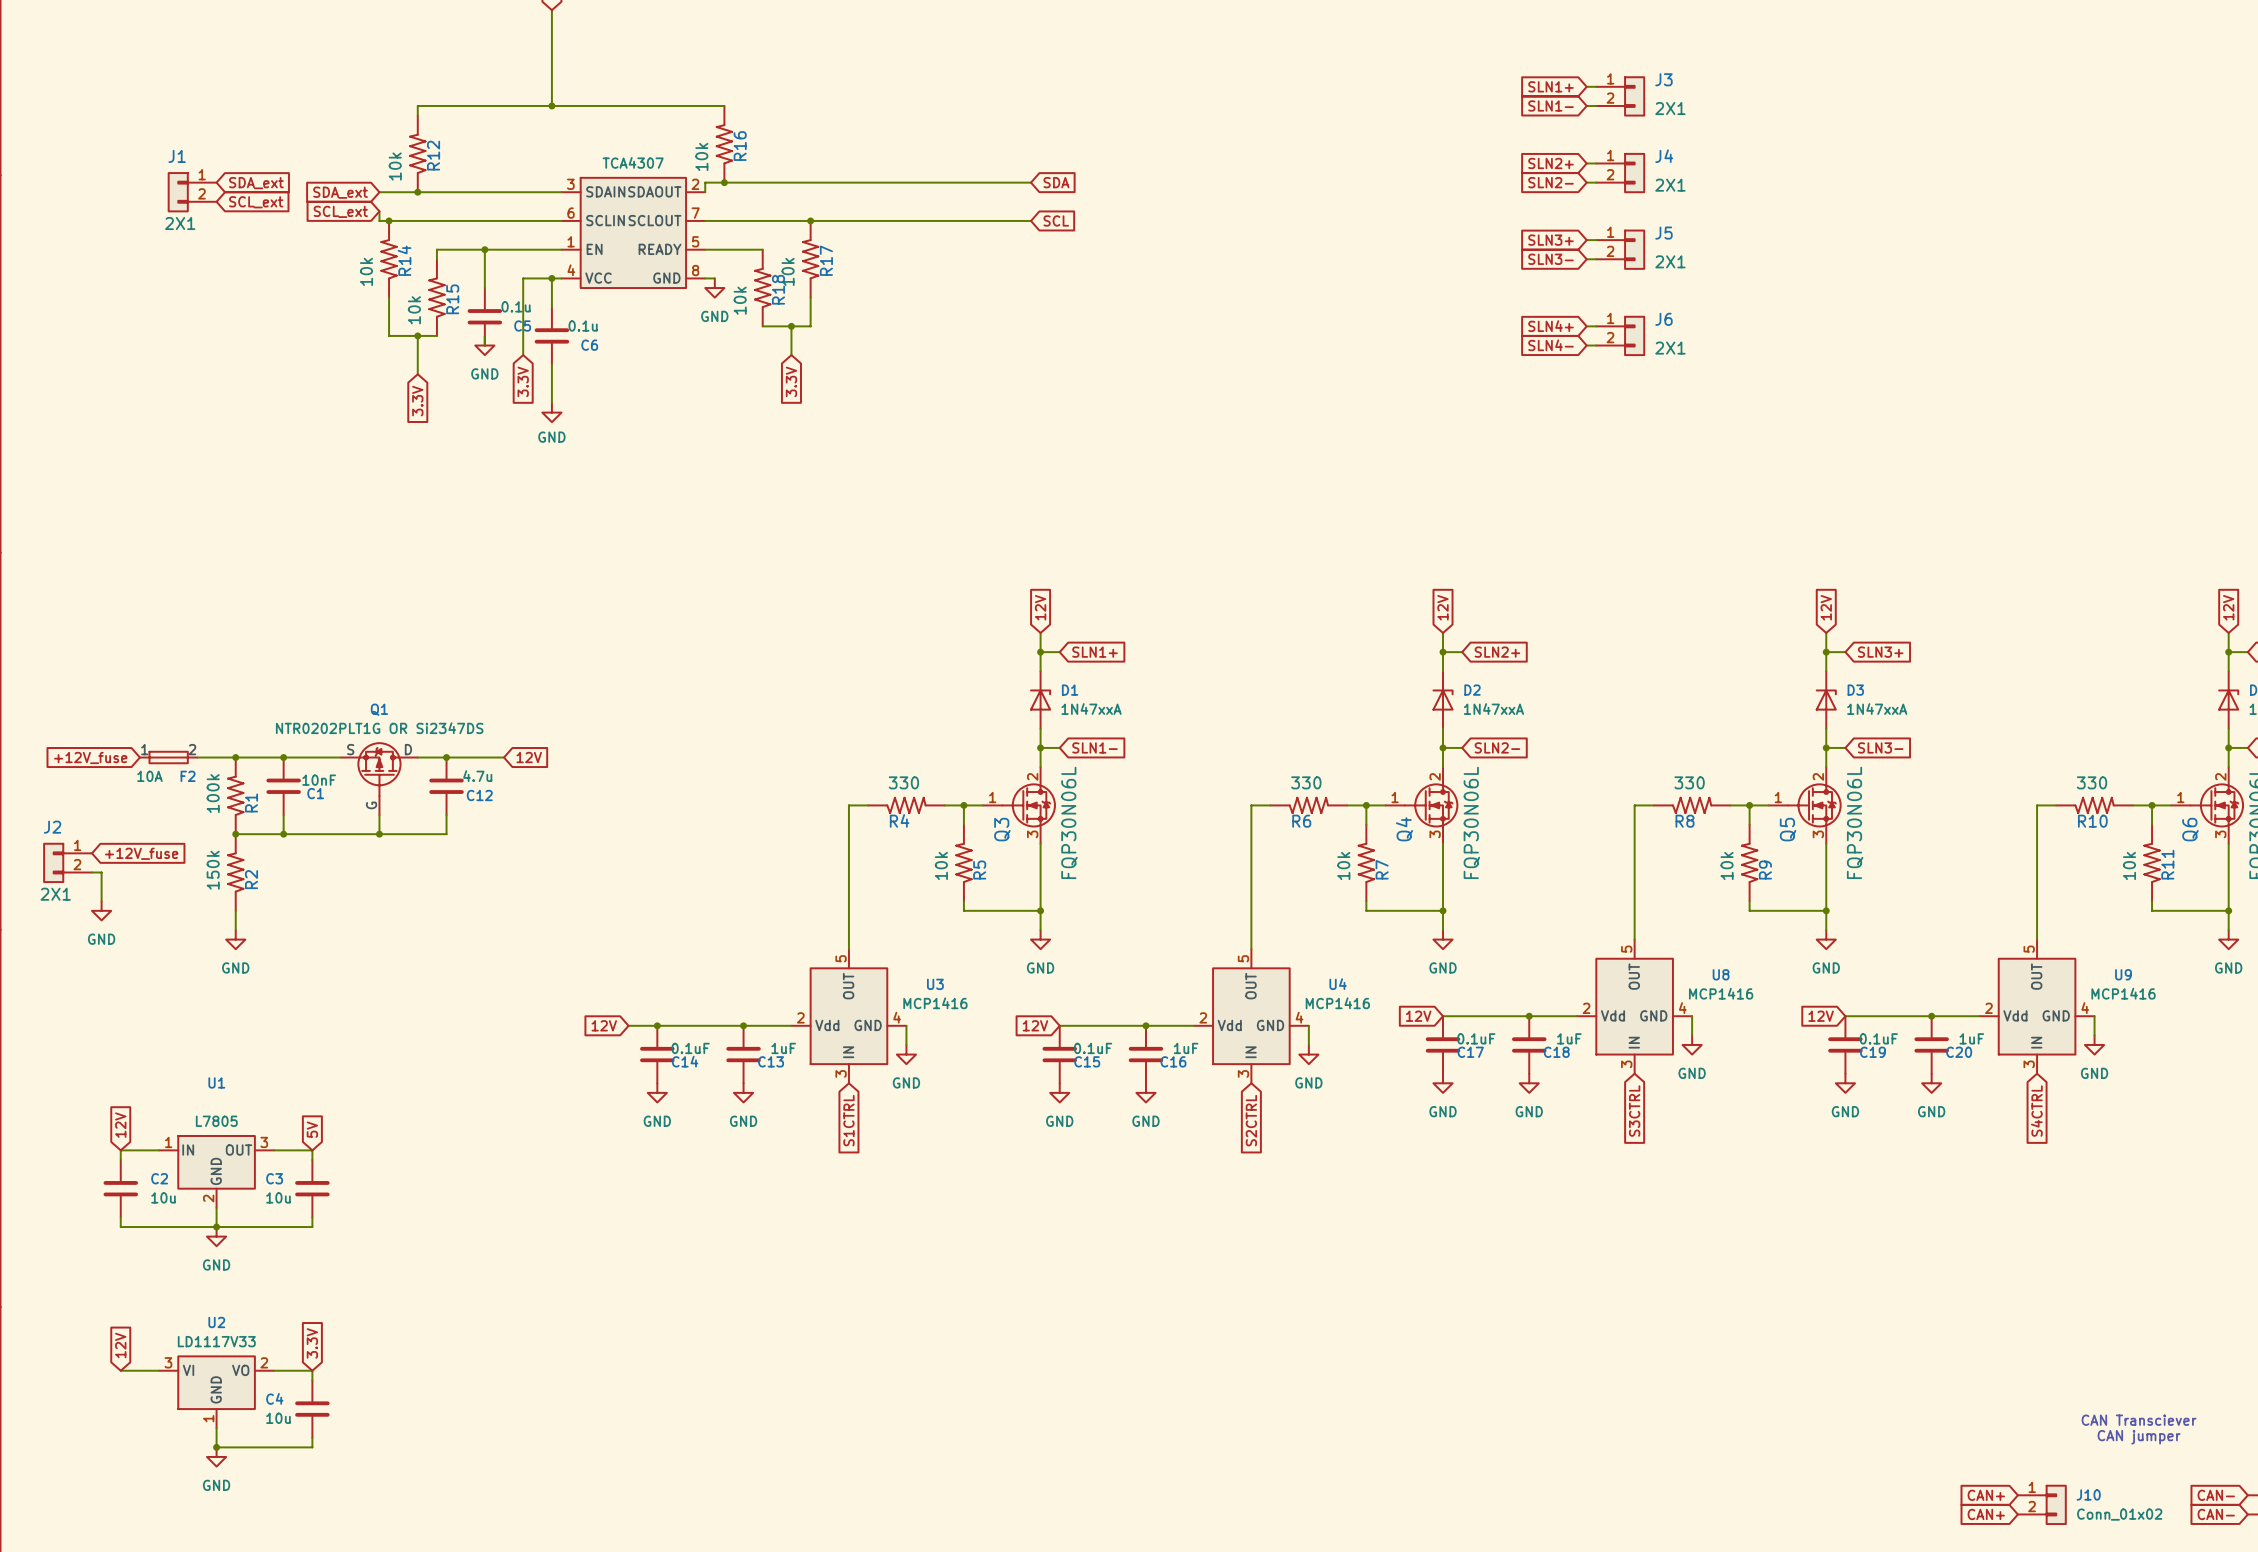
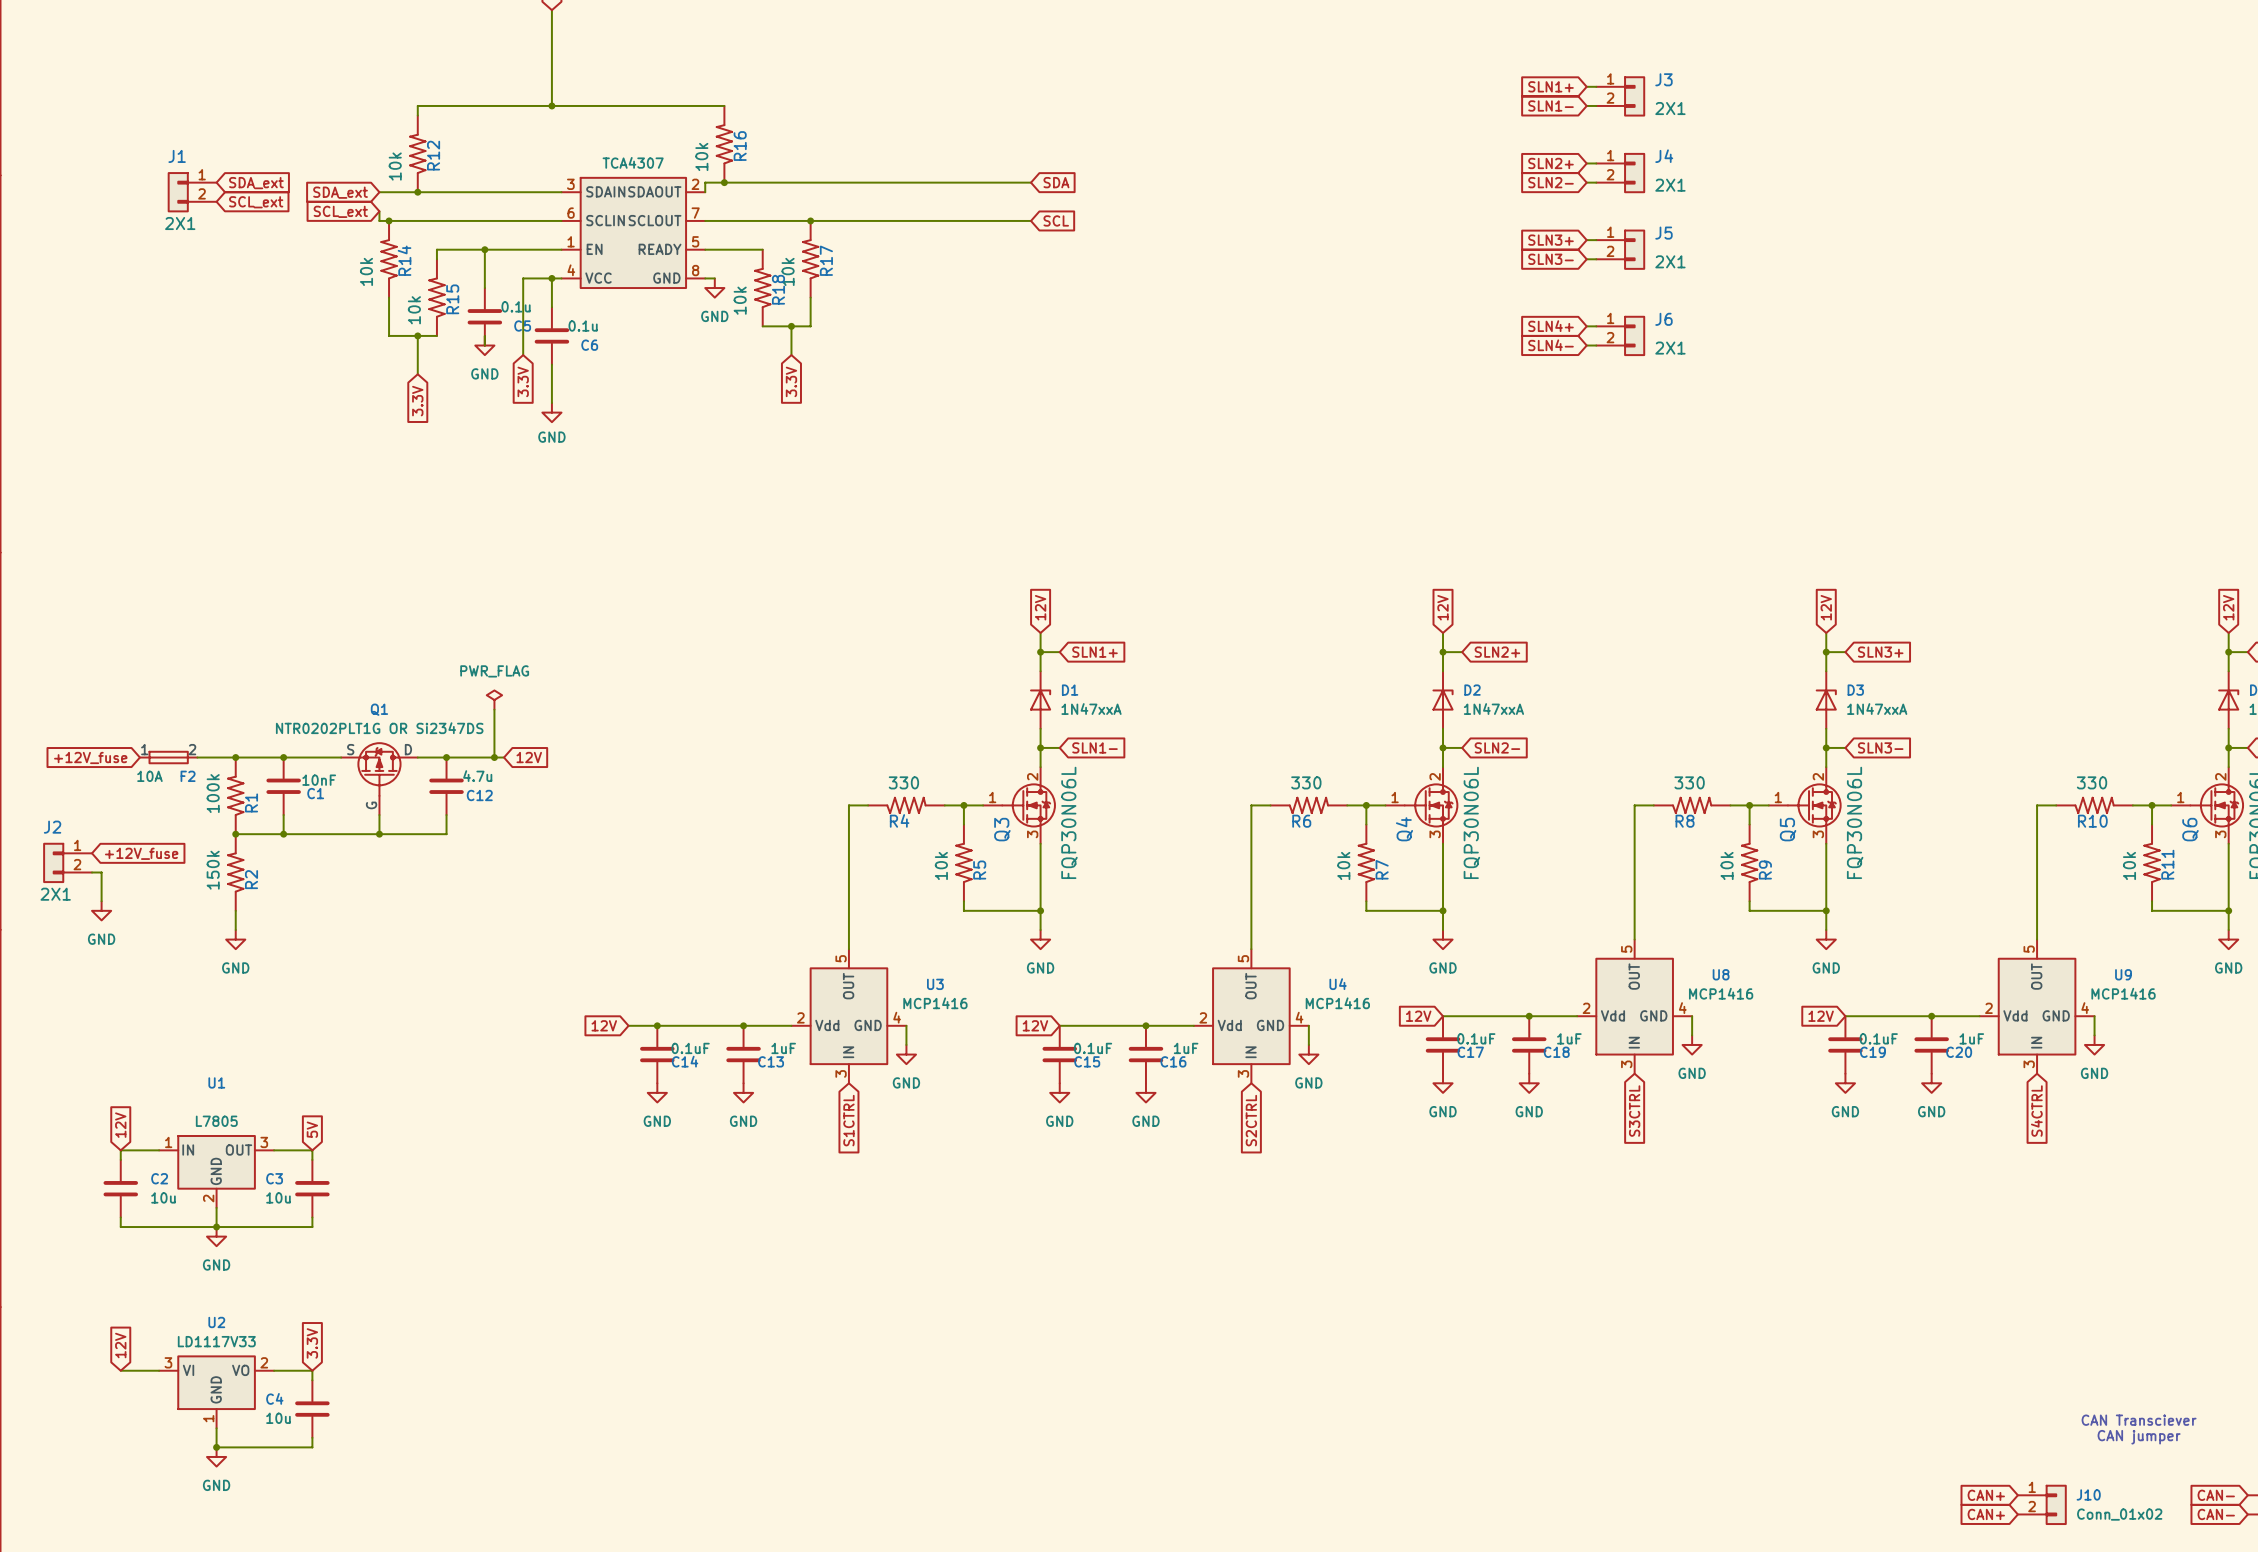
power symbol: none -> PWR_FLAG (494, 700)
wire: none -> (494, 709) (494, 757)
junction: none -> (494, 757)

